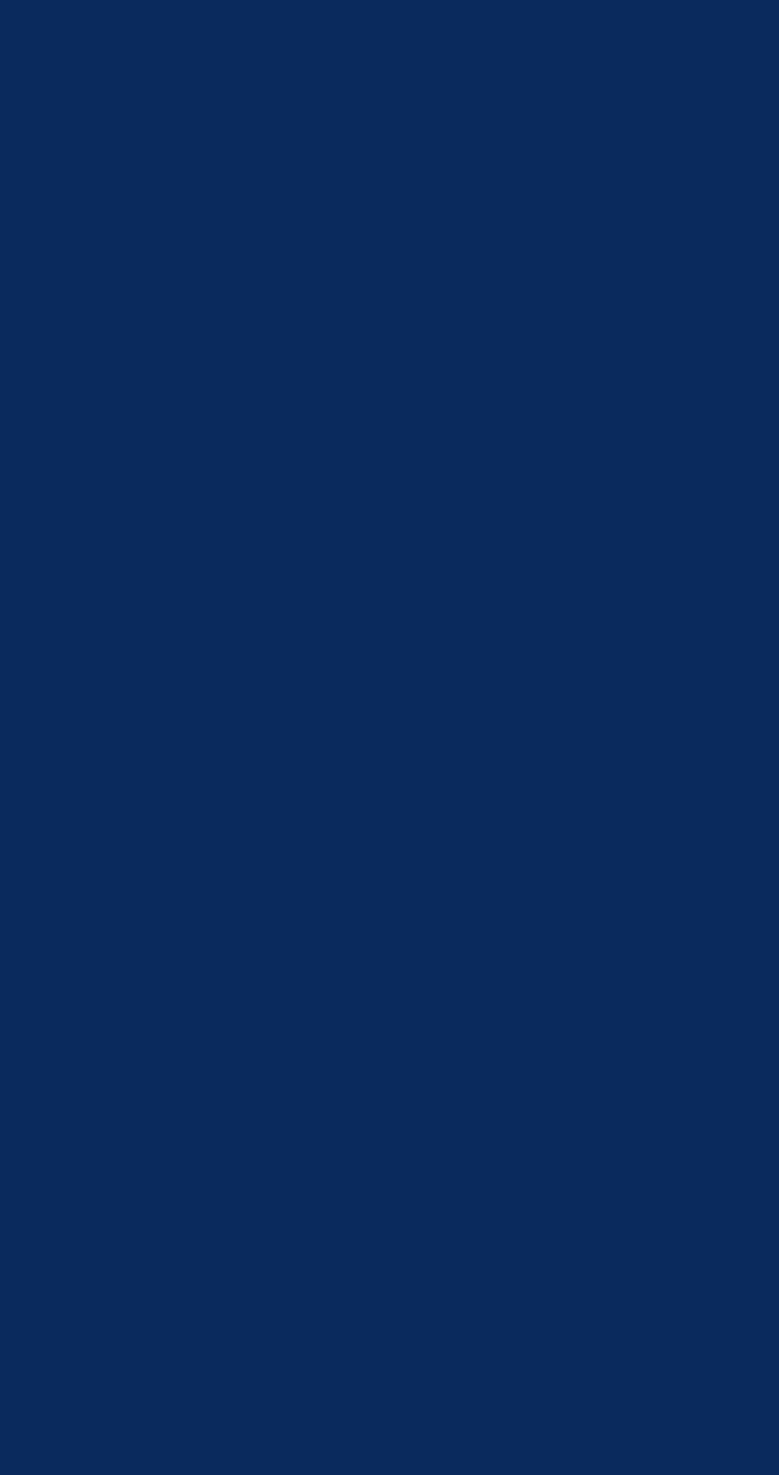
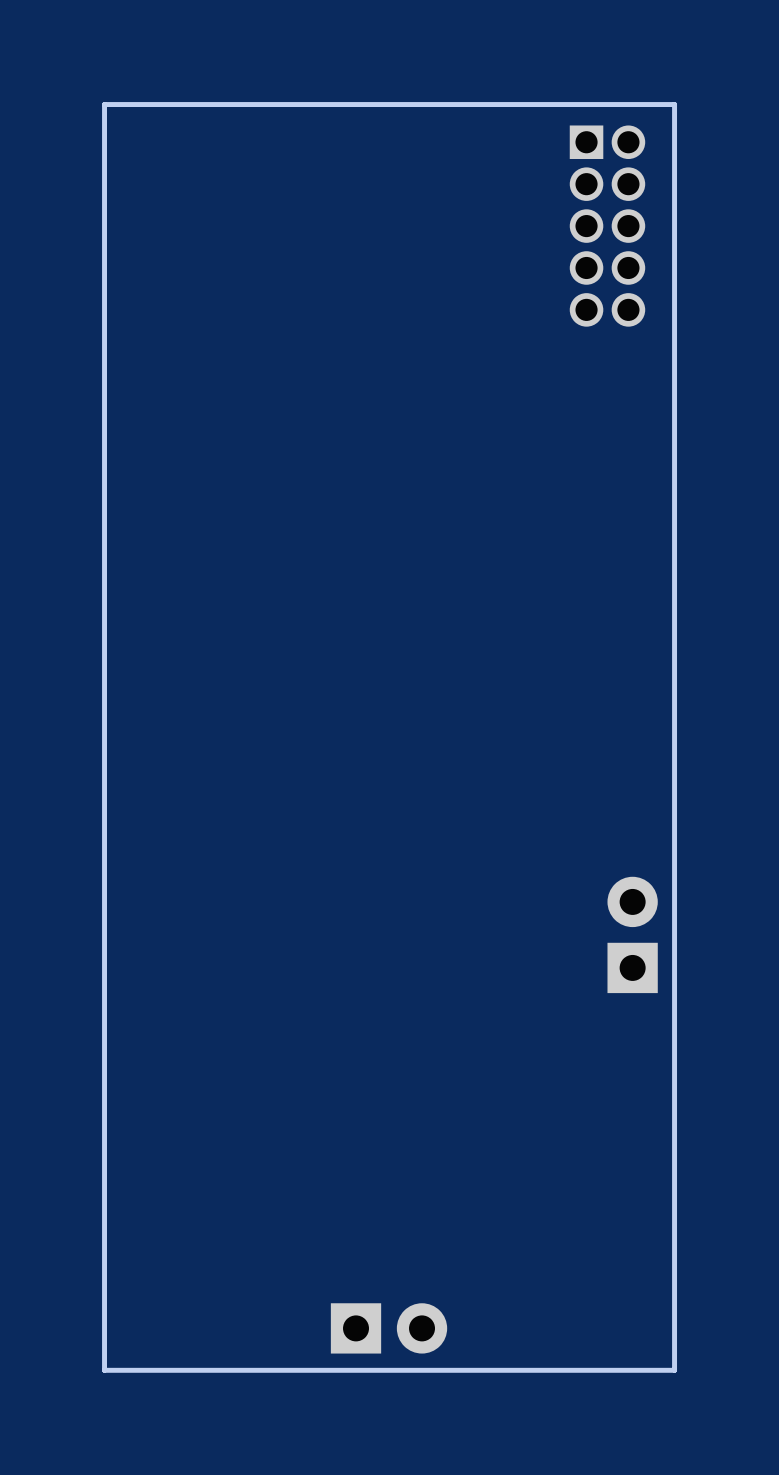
board edge: none -> (674, 104) (674, 1370) (104, 1370) (104, 104) (674, 104)
part: none -> (607, 226)
part: none -> (632, 934)
part: none -> (389, 1328)

